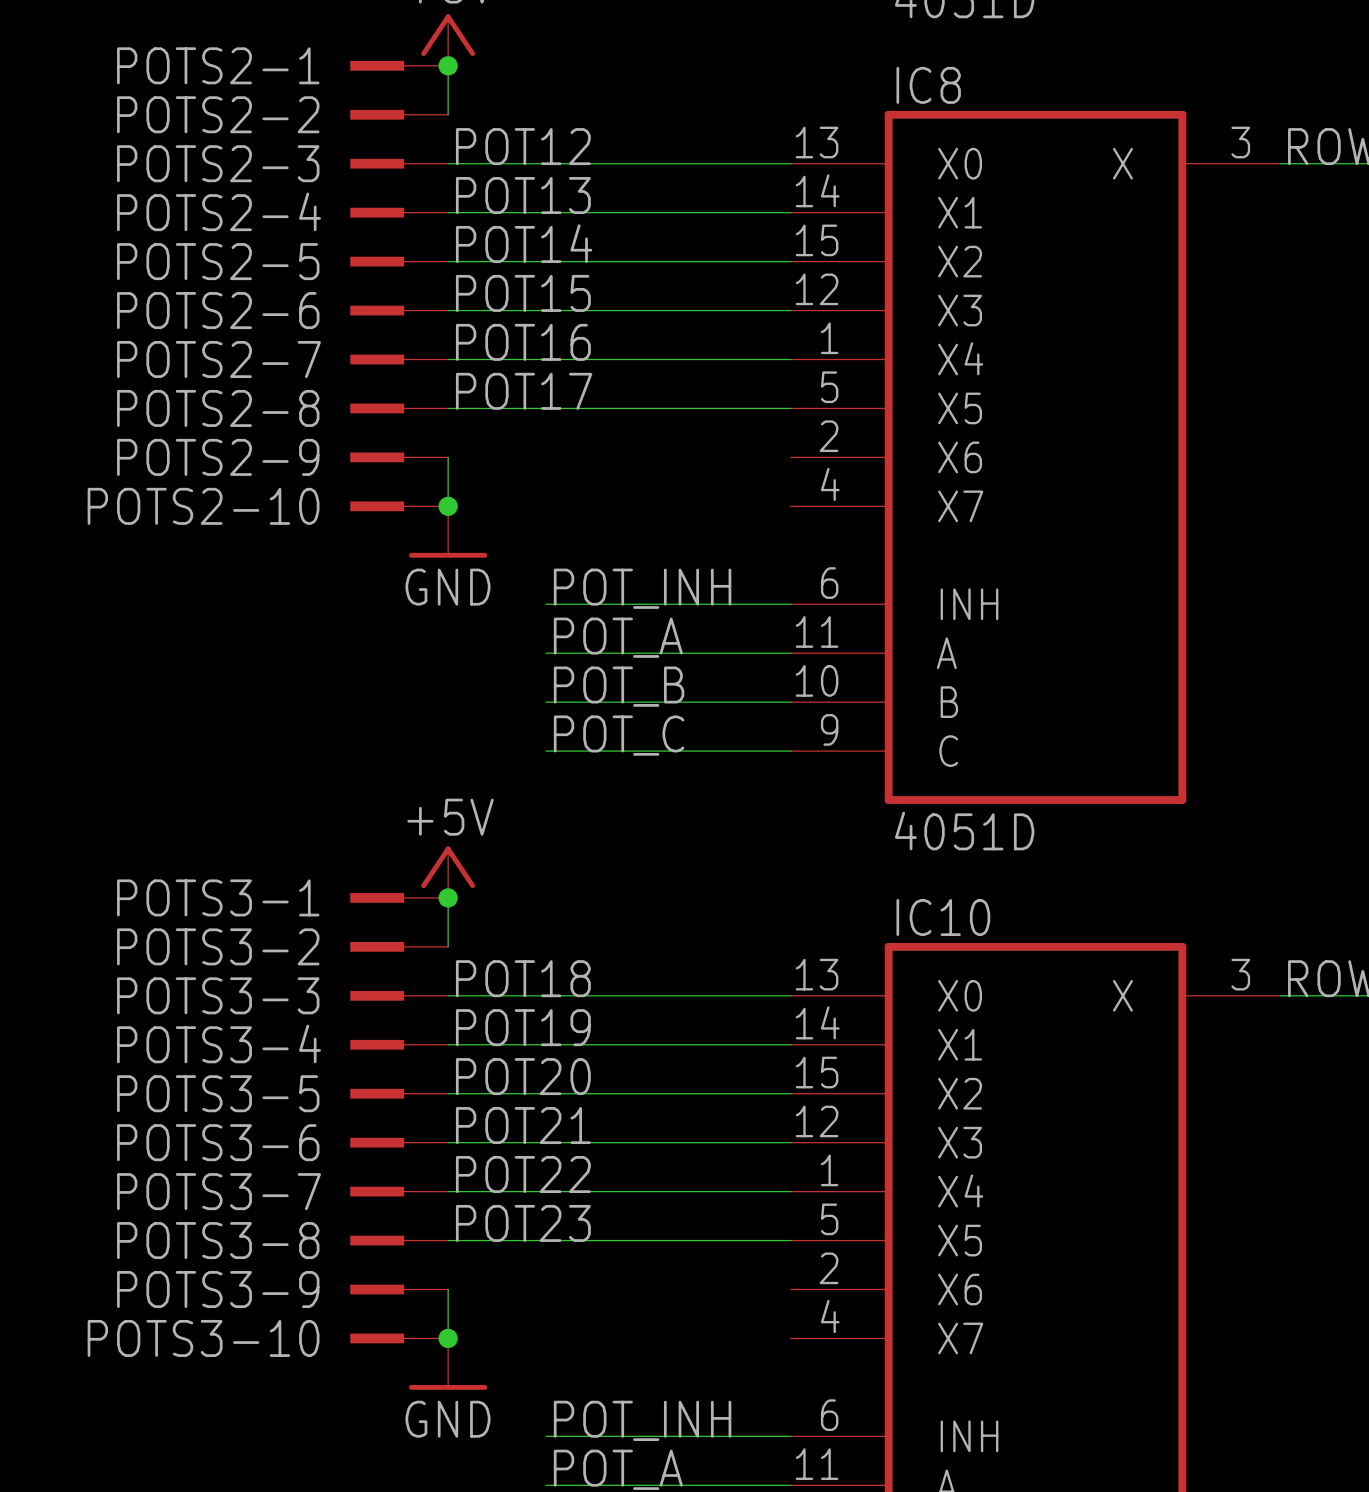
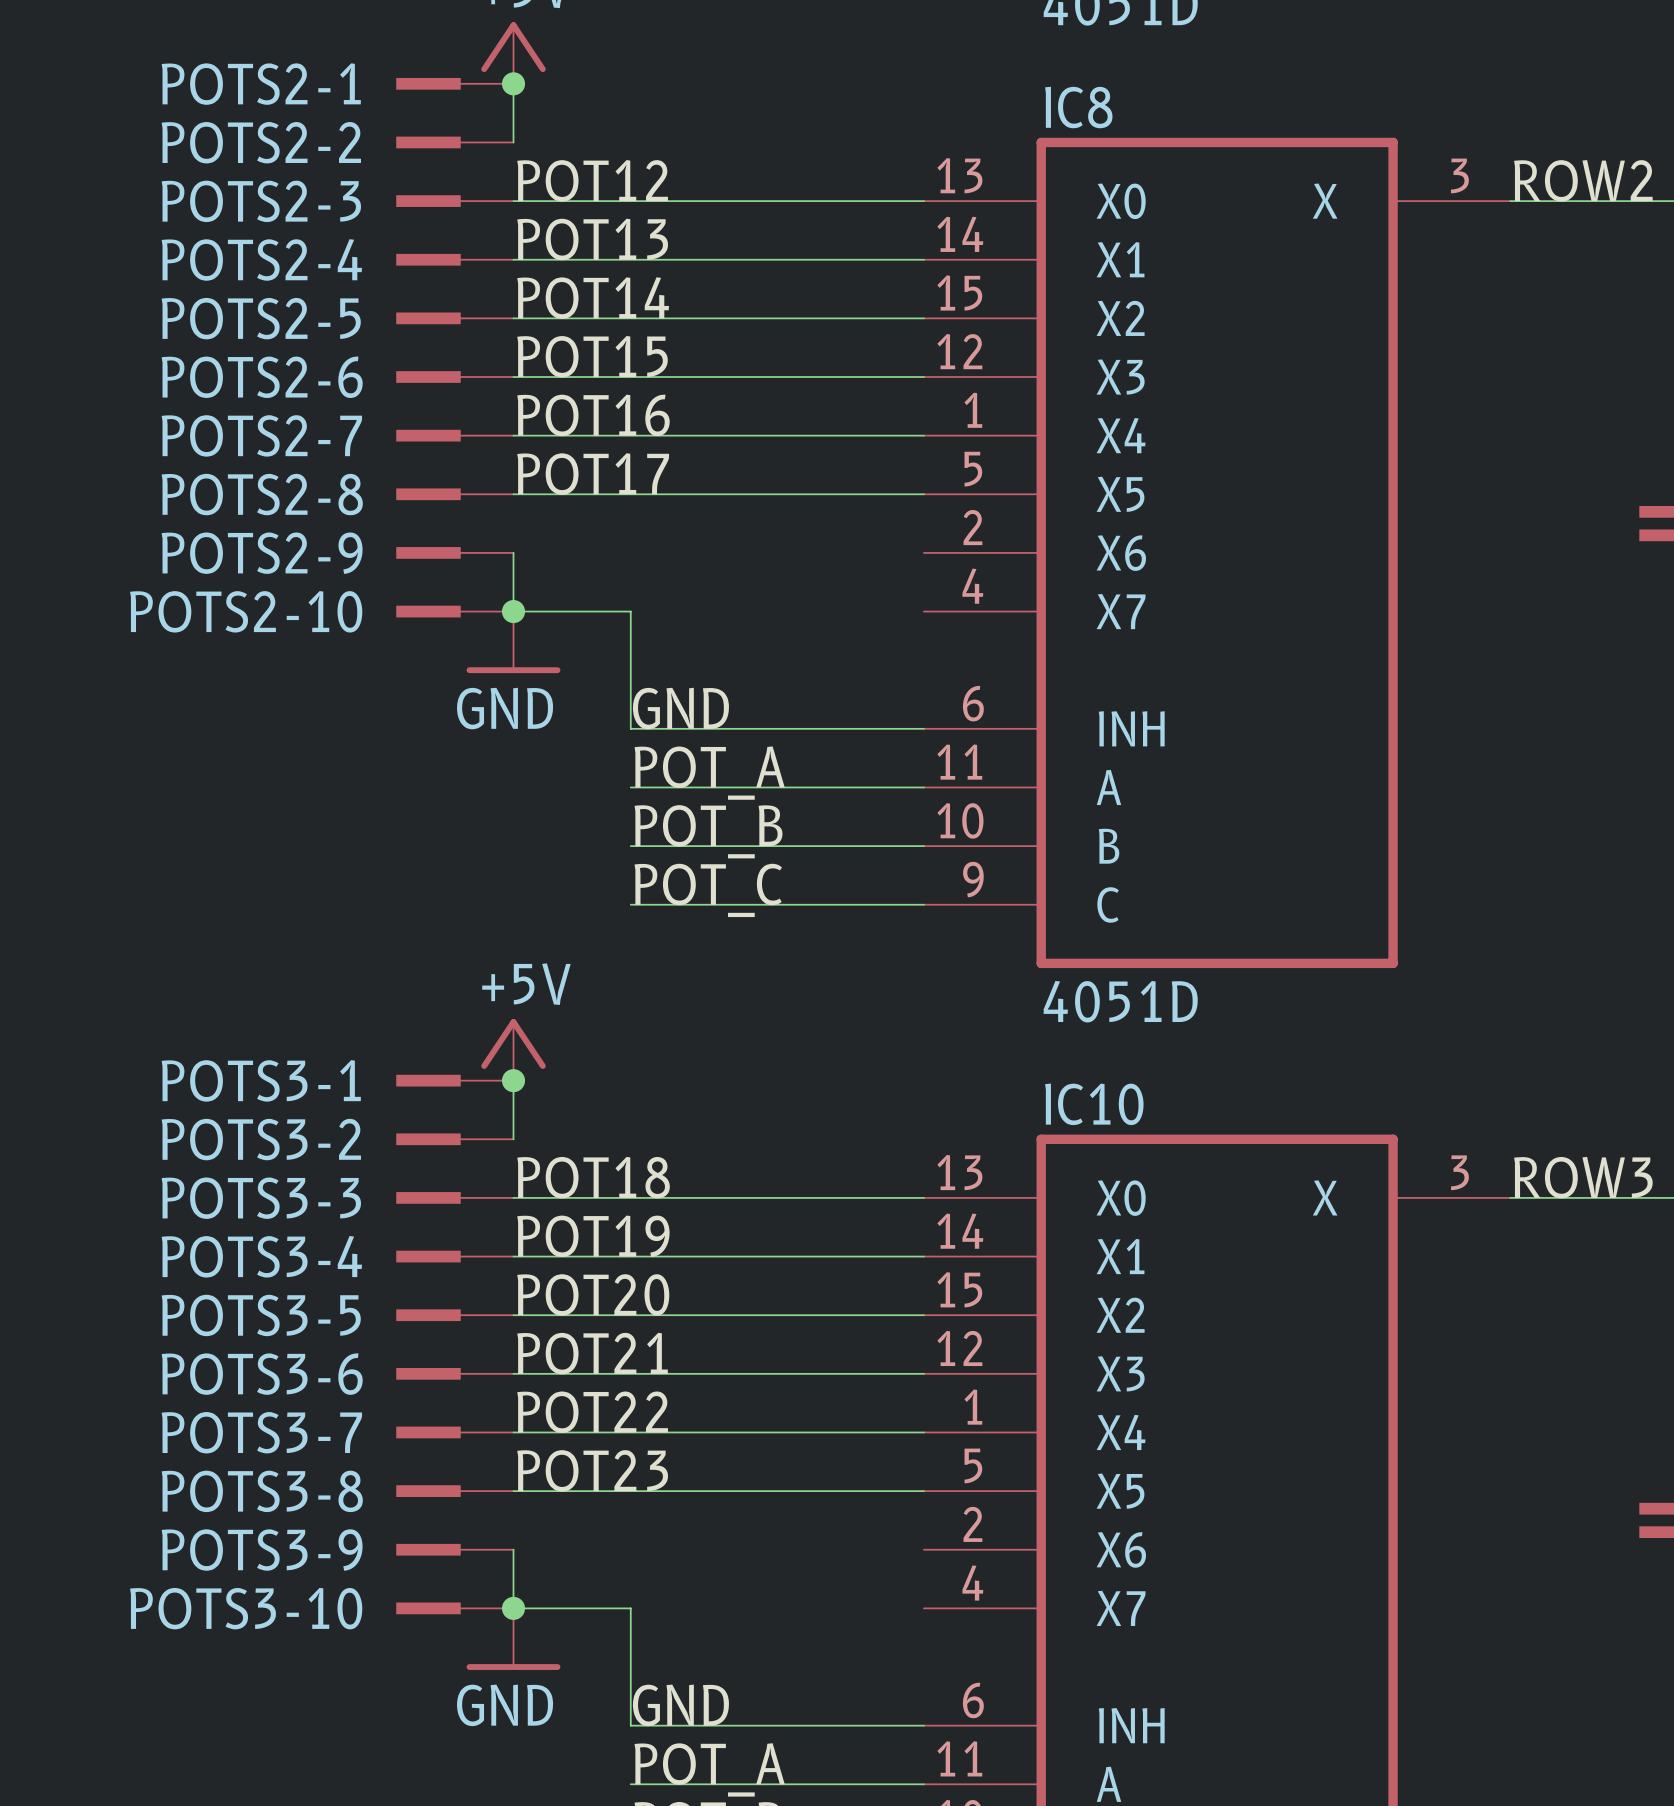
wire: none -> (513, 611) (630, 611) (630, 728)
label: POT_INH (642, 588) -> GND (680, 708)
wire: none -> (513, 1608) (630, 1608) (630, 1725)
label: POT_INH (642, 1420) -> GND (680, 1705)

